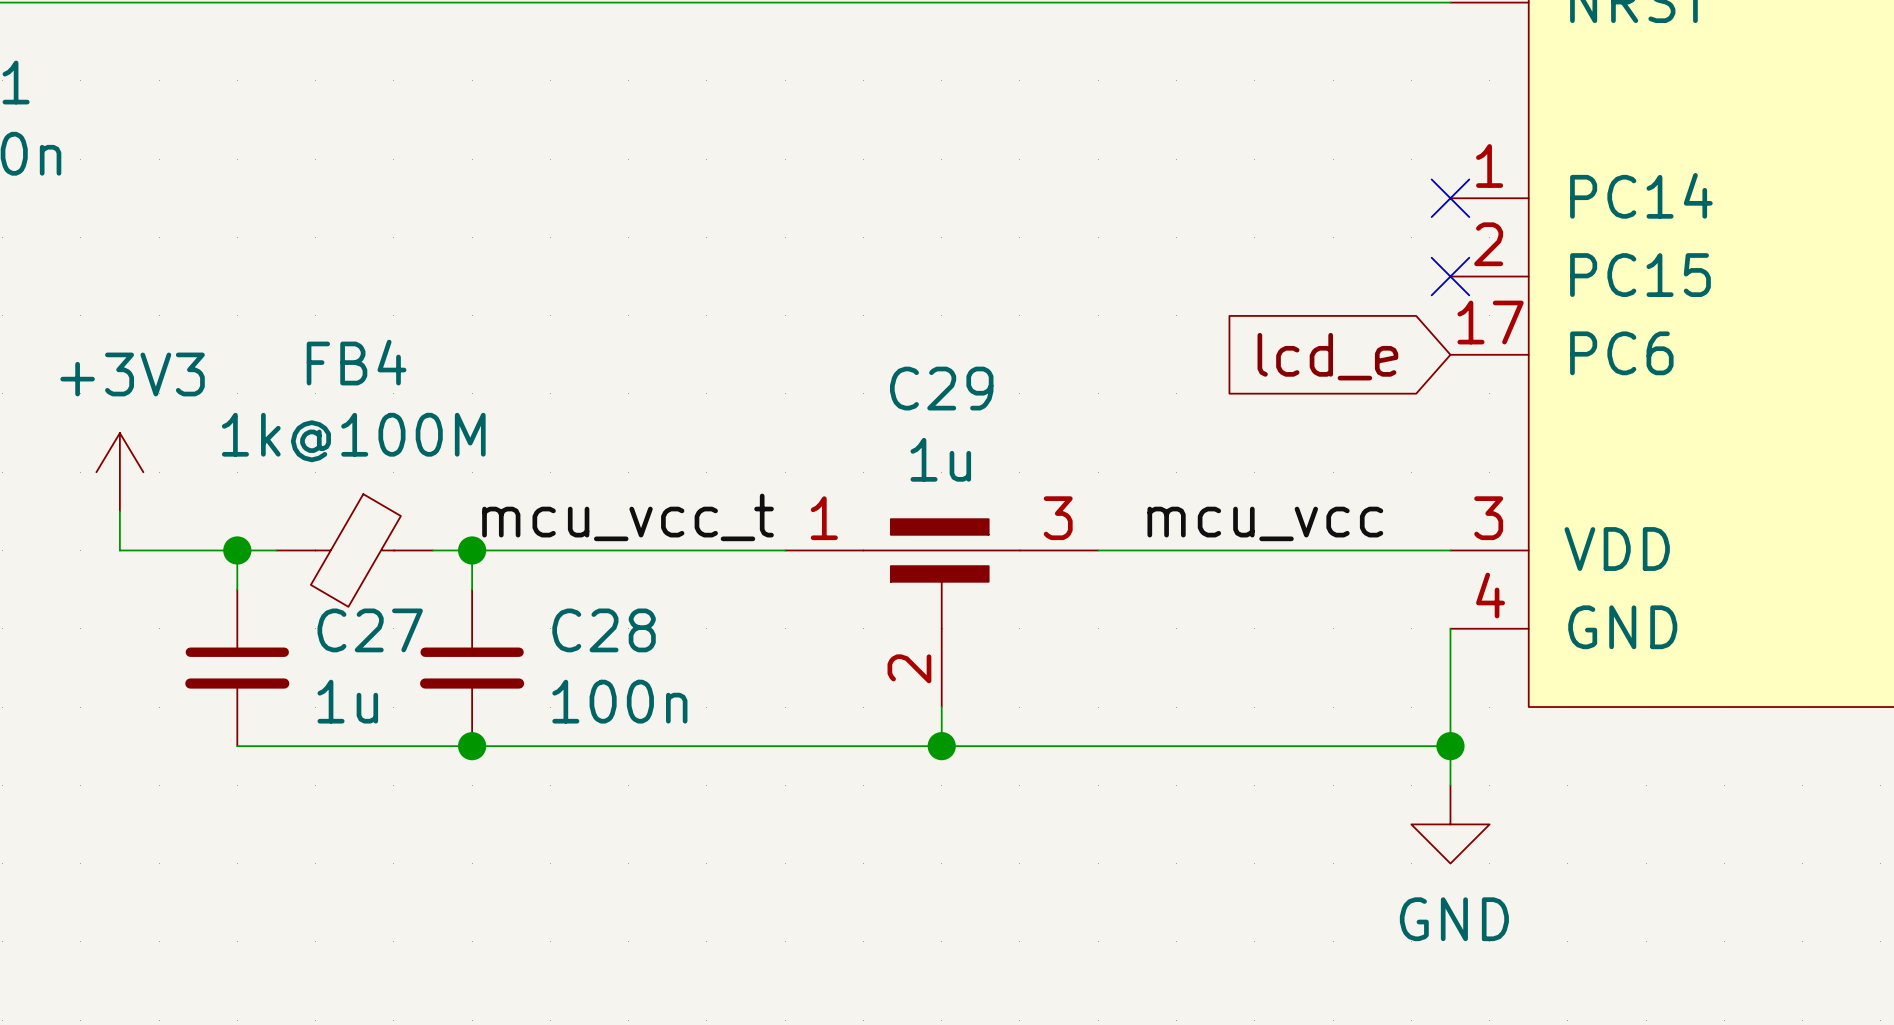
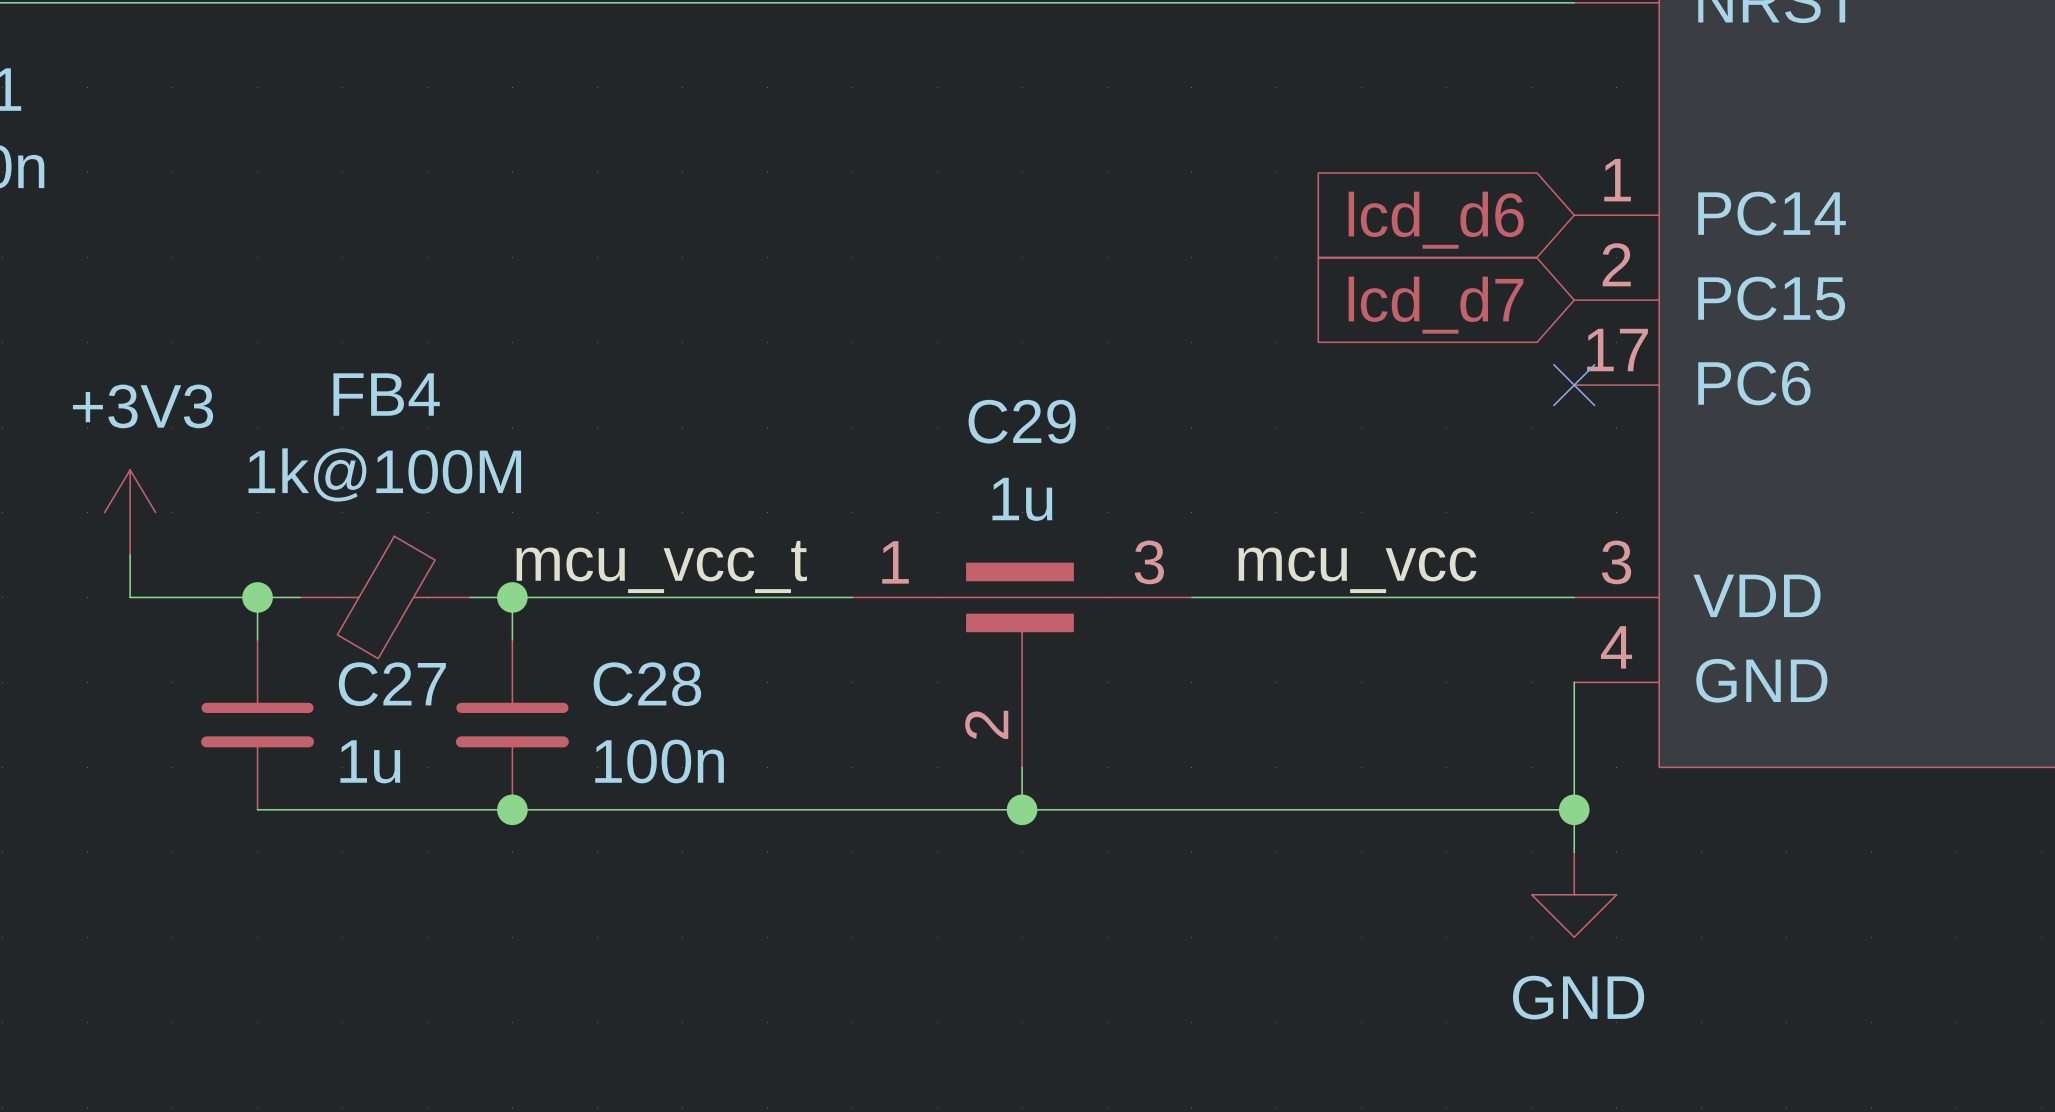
no-connect mark: (1450, 198) -> none
global label: none -> lcd_d6 (1436, 220)
no-connect mark: (1450, 276) -> none
no-connect mark: none -> (1574, 385)
global label: lcd_e (1327, 356) -> lcd_d7 (1436, 305)

